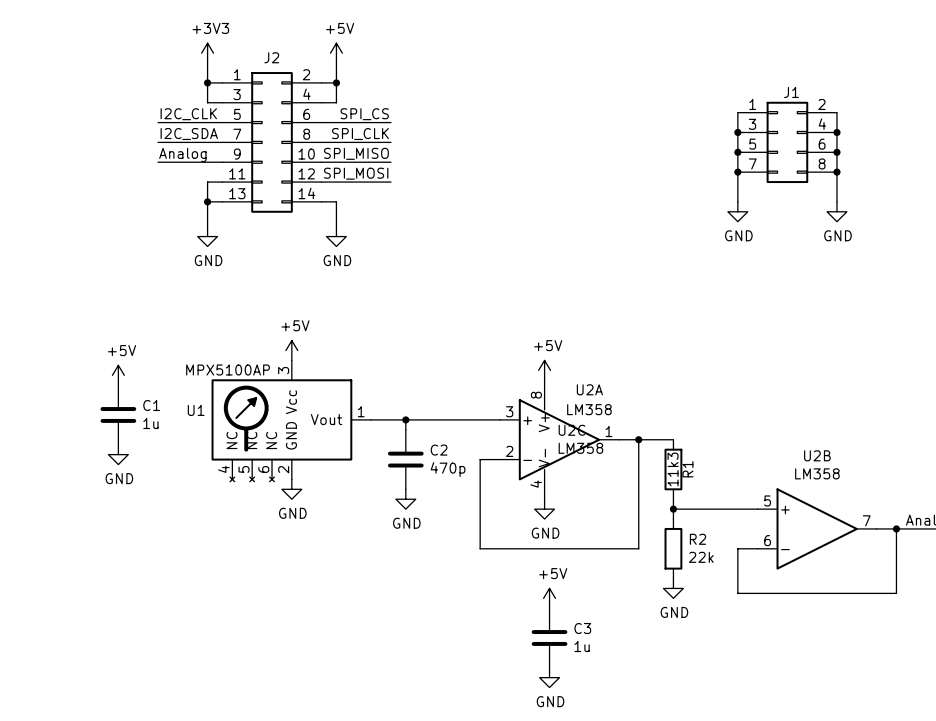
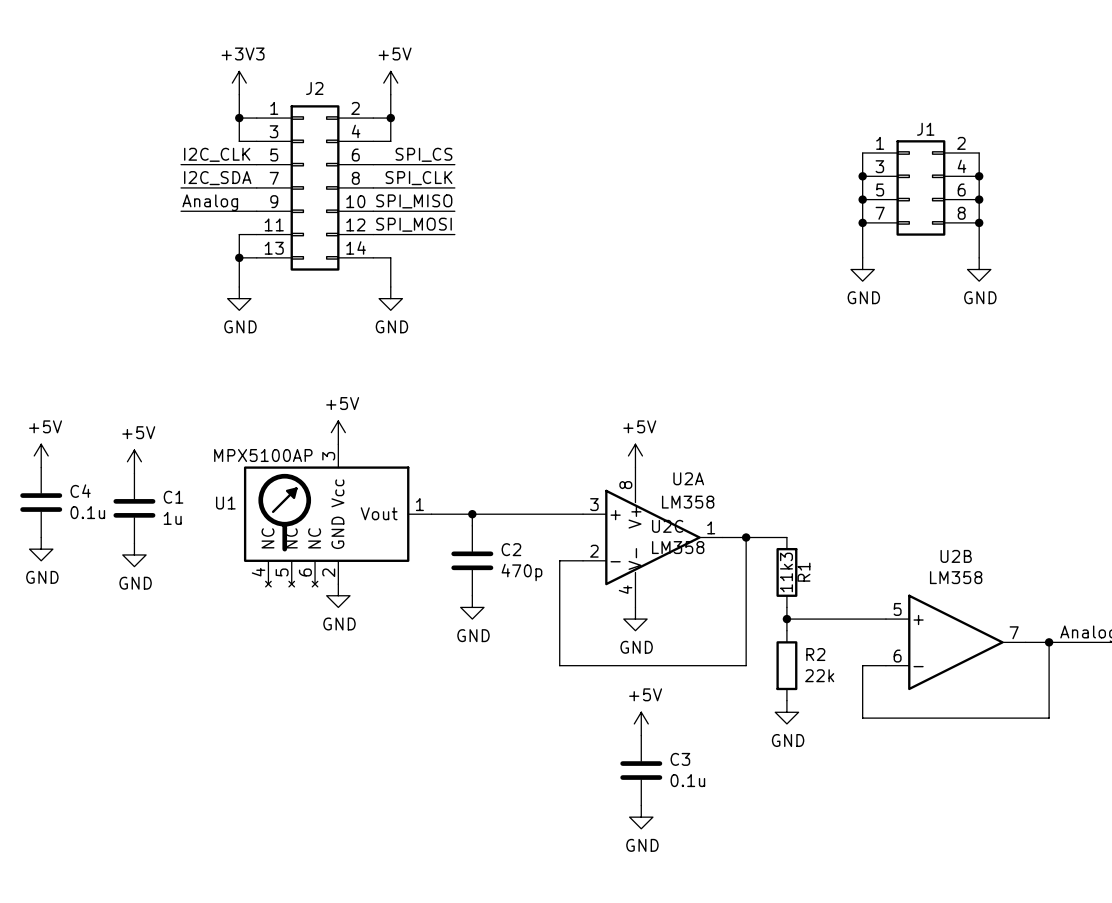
power symbol: none -> +5V (41, 455)
C4: none -> 0.1u (41, 502)
power symbol: none -> GND (41, 549)
C3 value: 1u (582, 646) -> 0.1u (687, 780)

